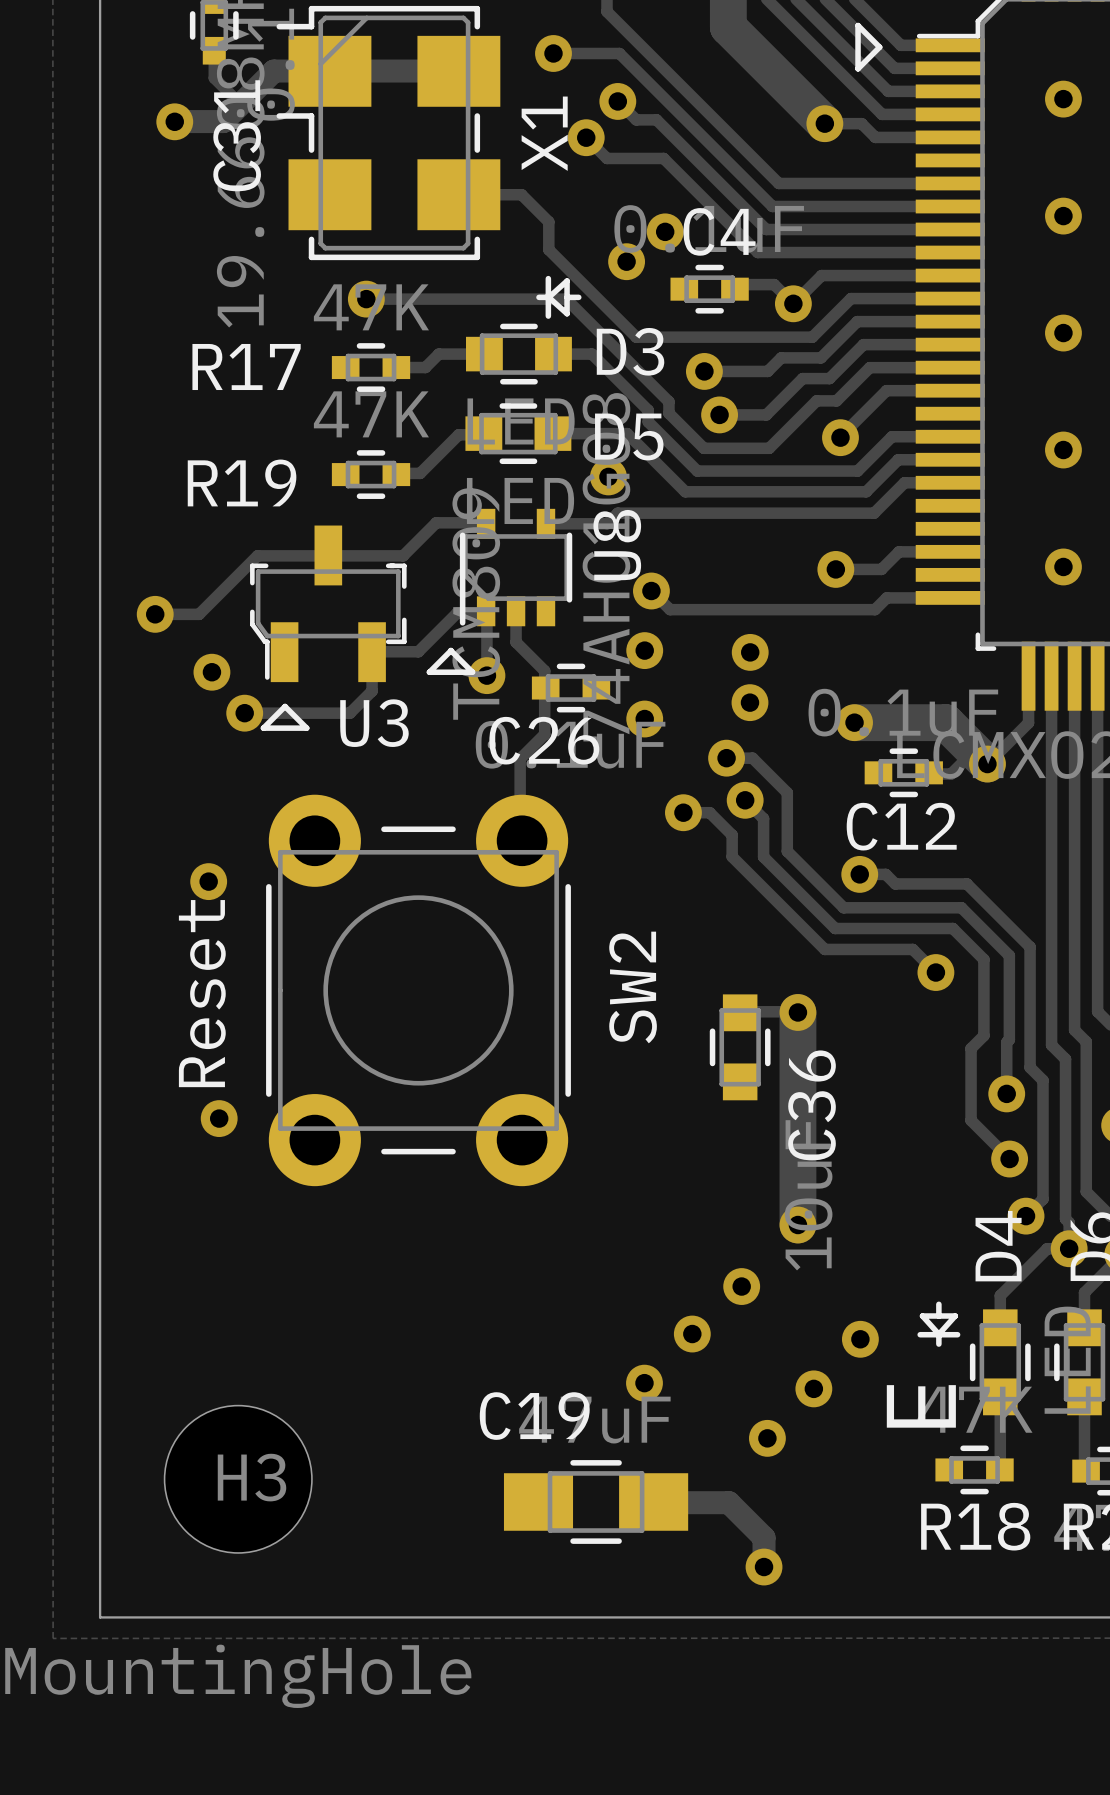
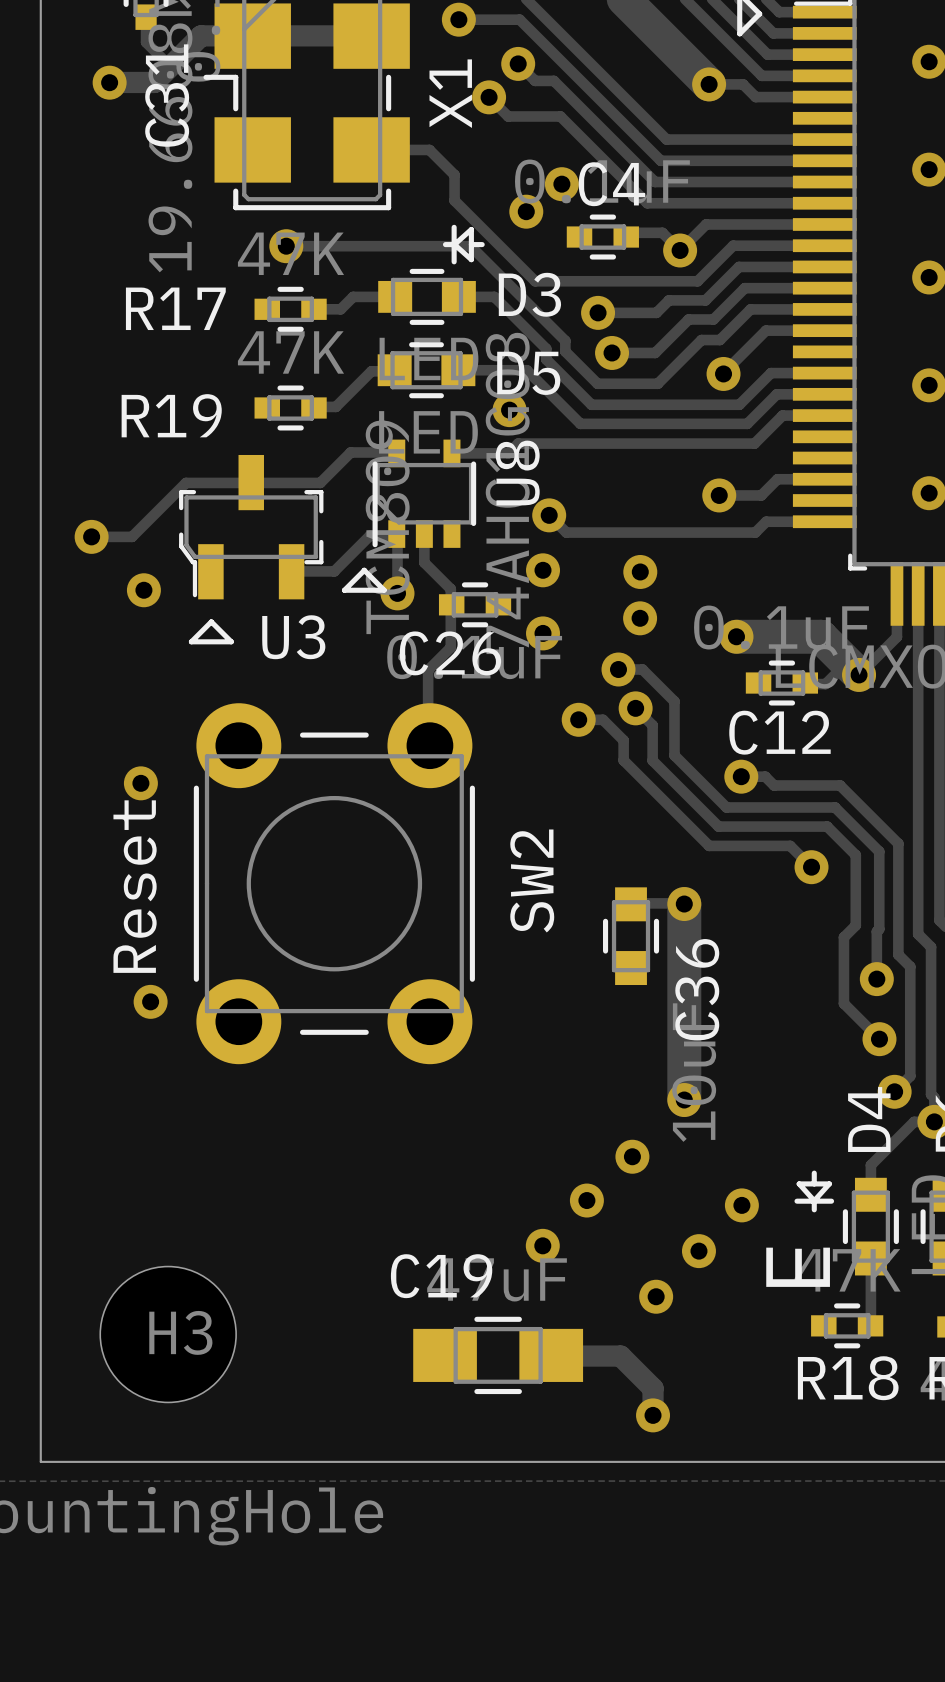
track: (372, 652) (372, 691) (349, 713) (244, 713) -> none
via: (244, 713) -> none

